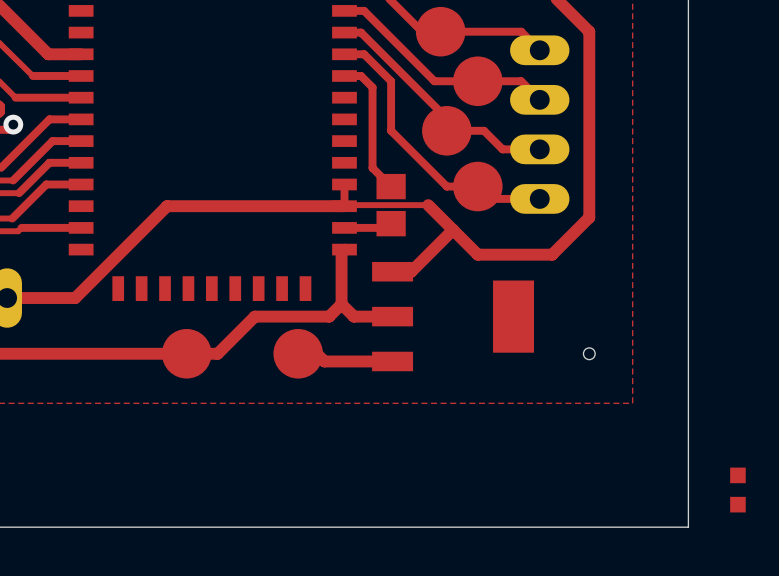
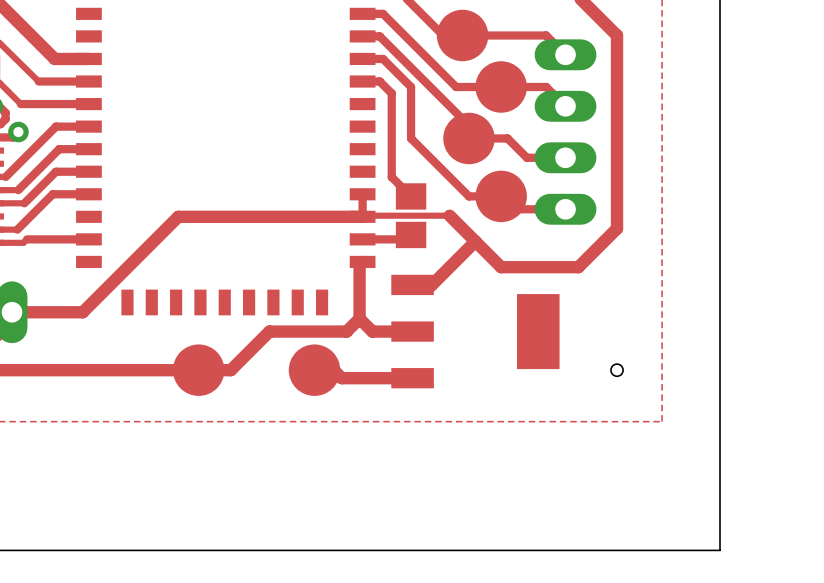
part: (737, 490) -> none

